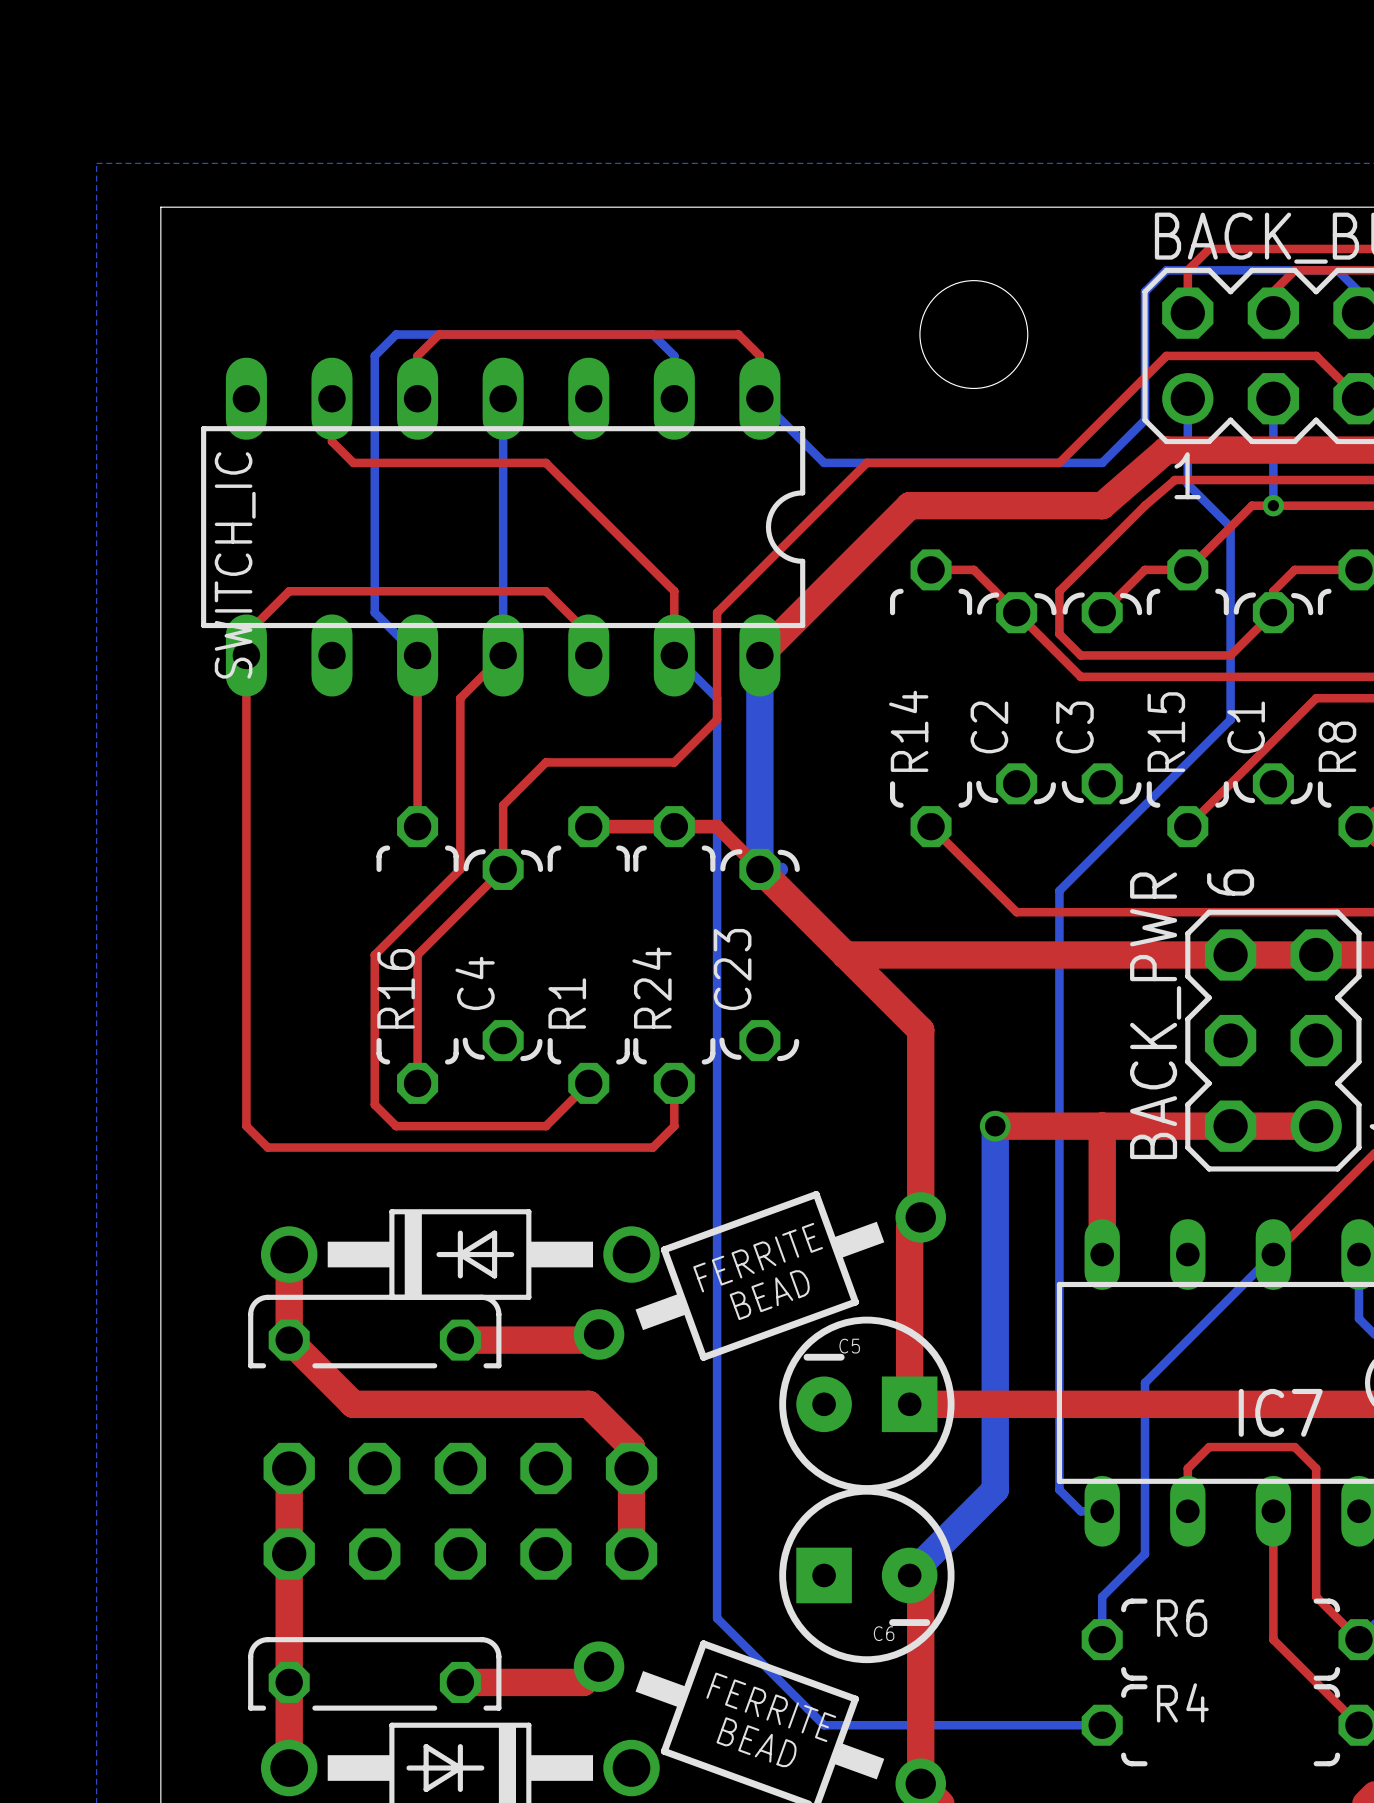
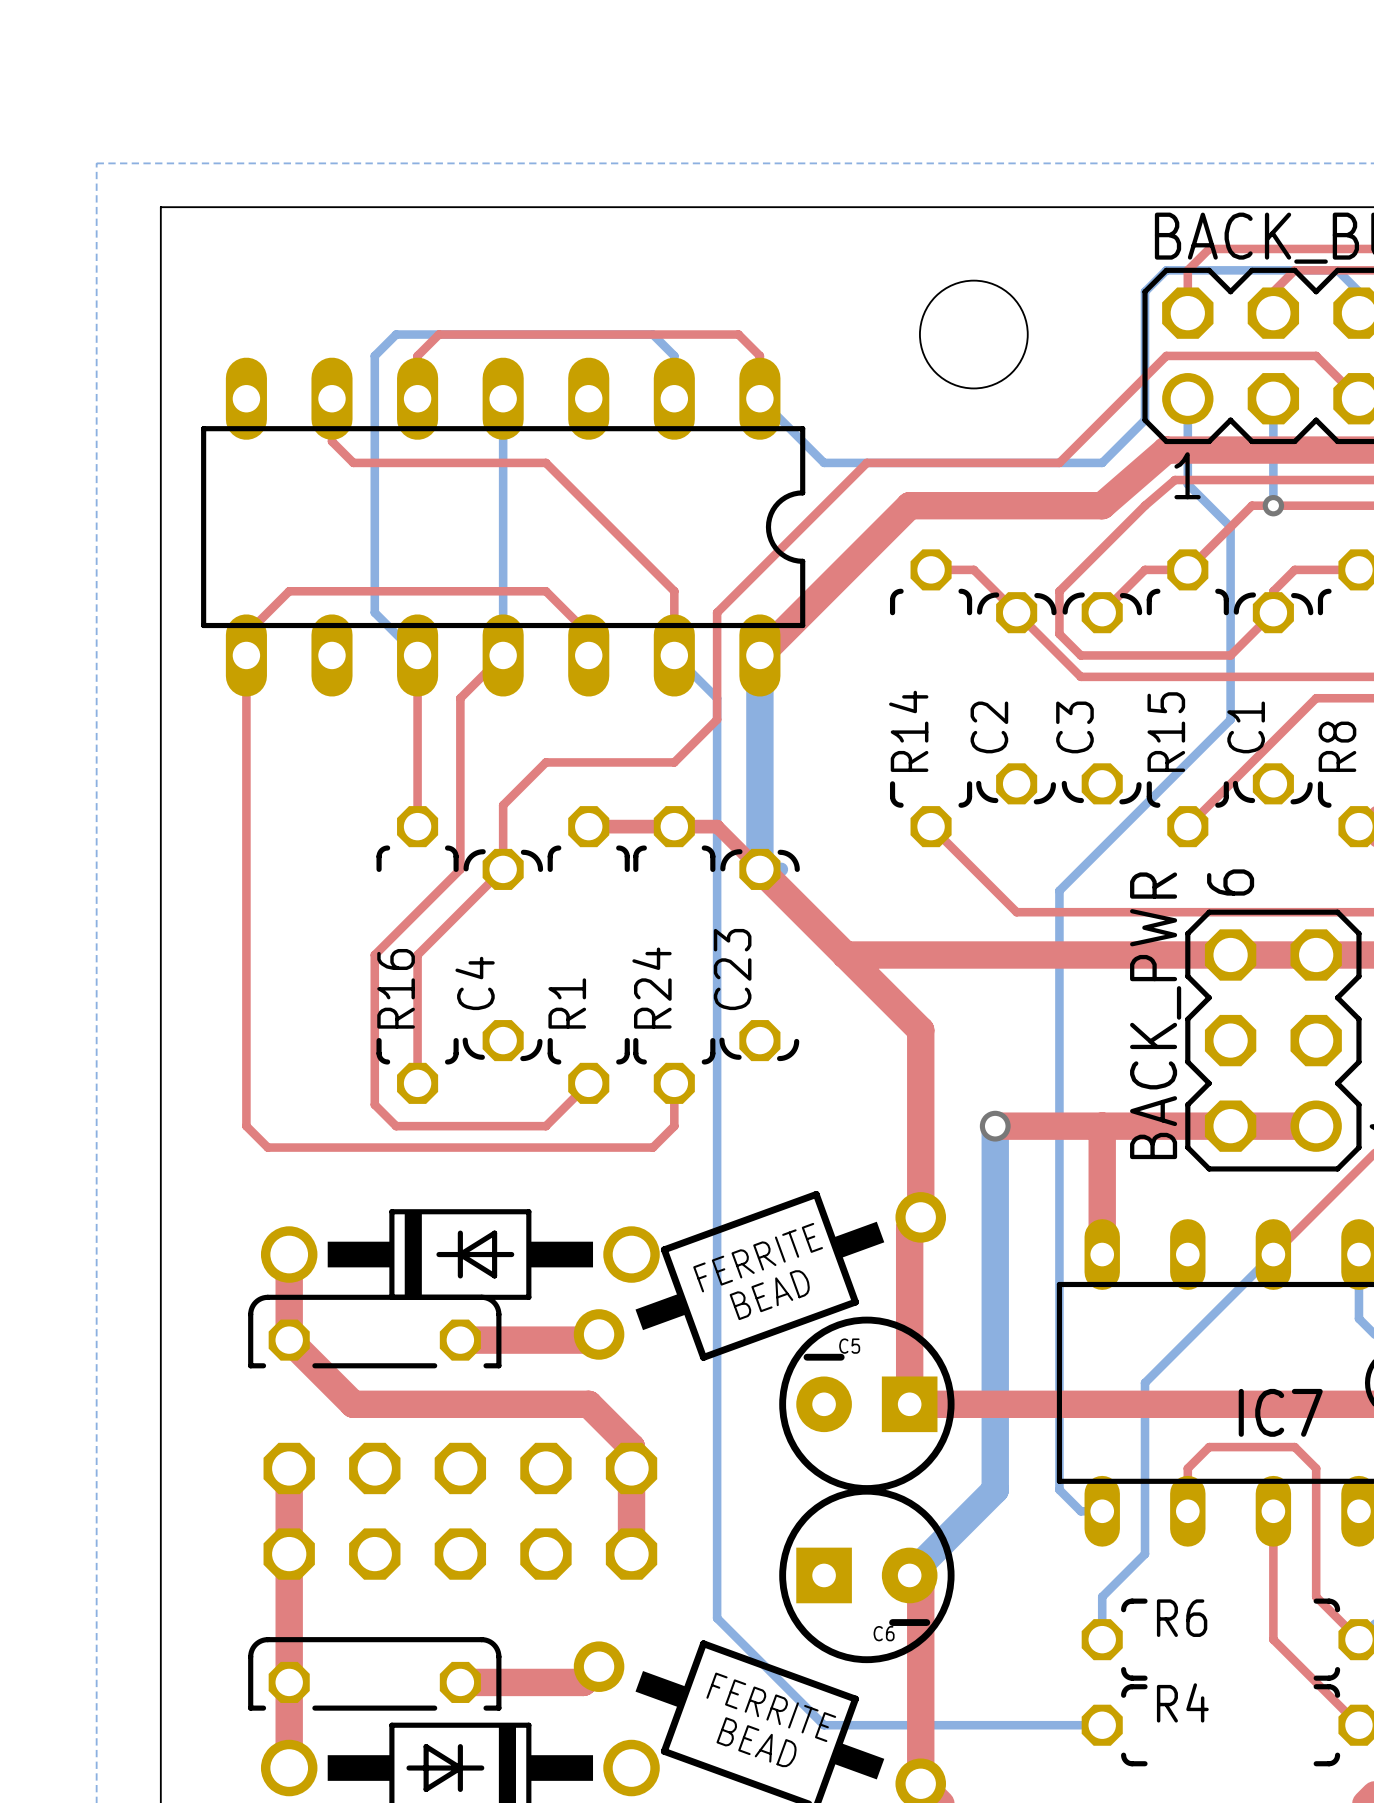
SWITCH_IC name: SWITCH_IC (235, 565) -> none

